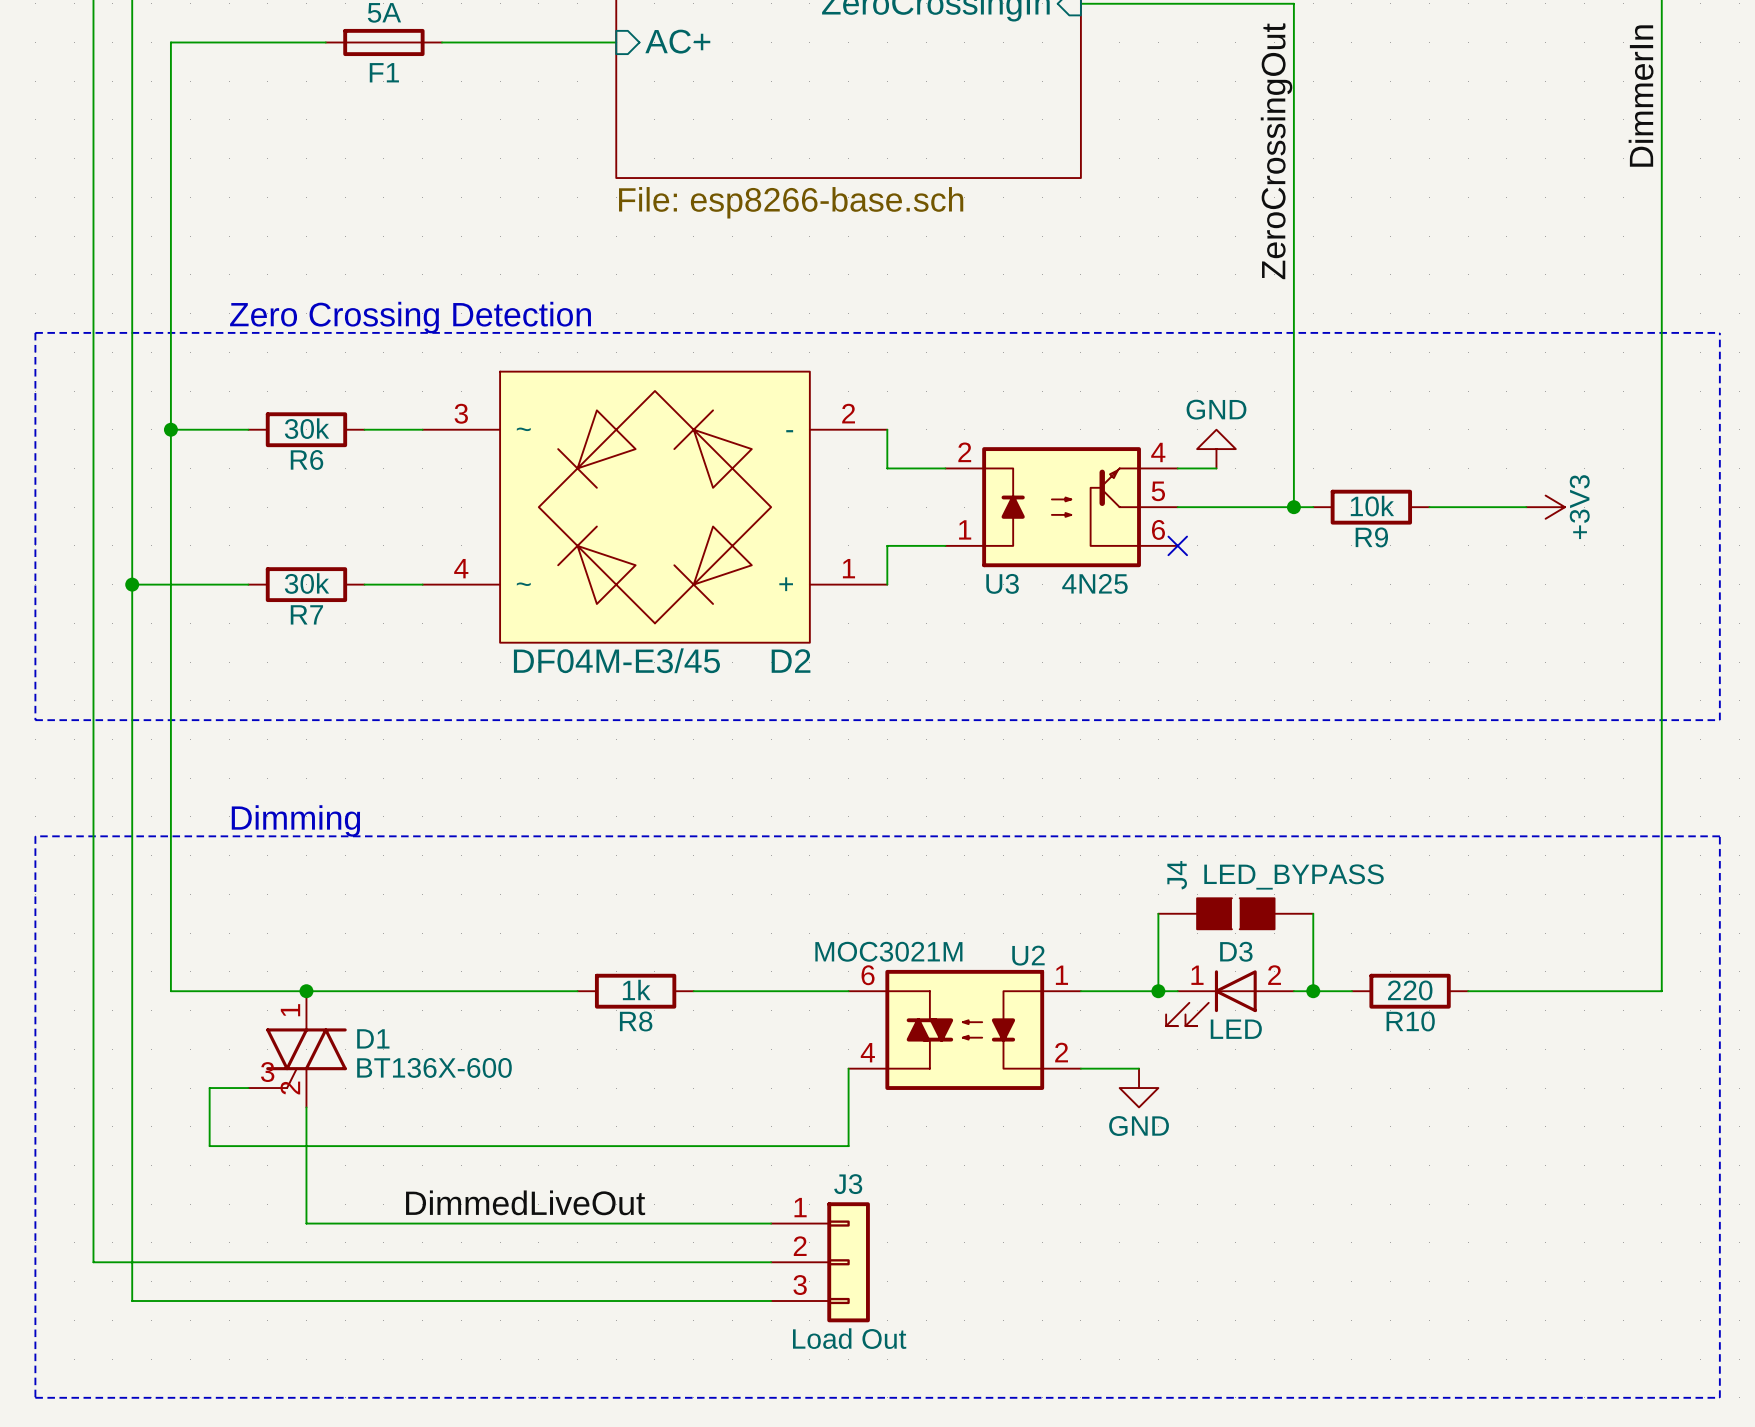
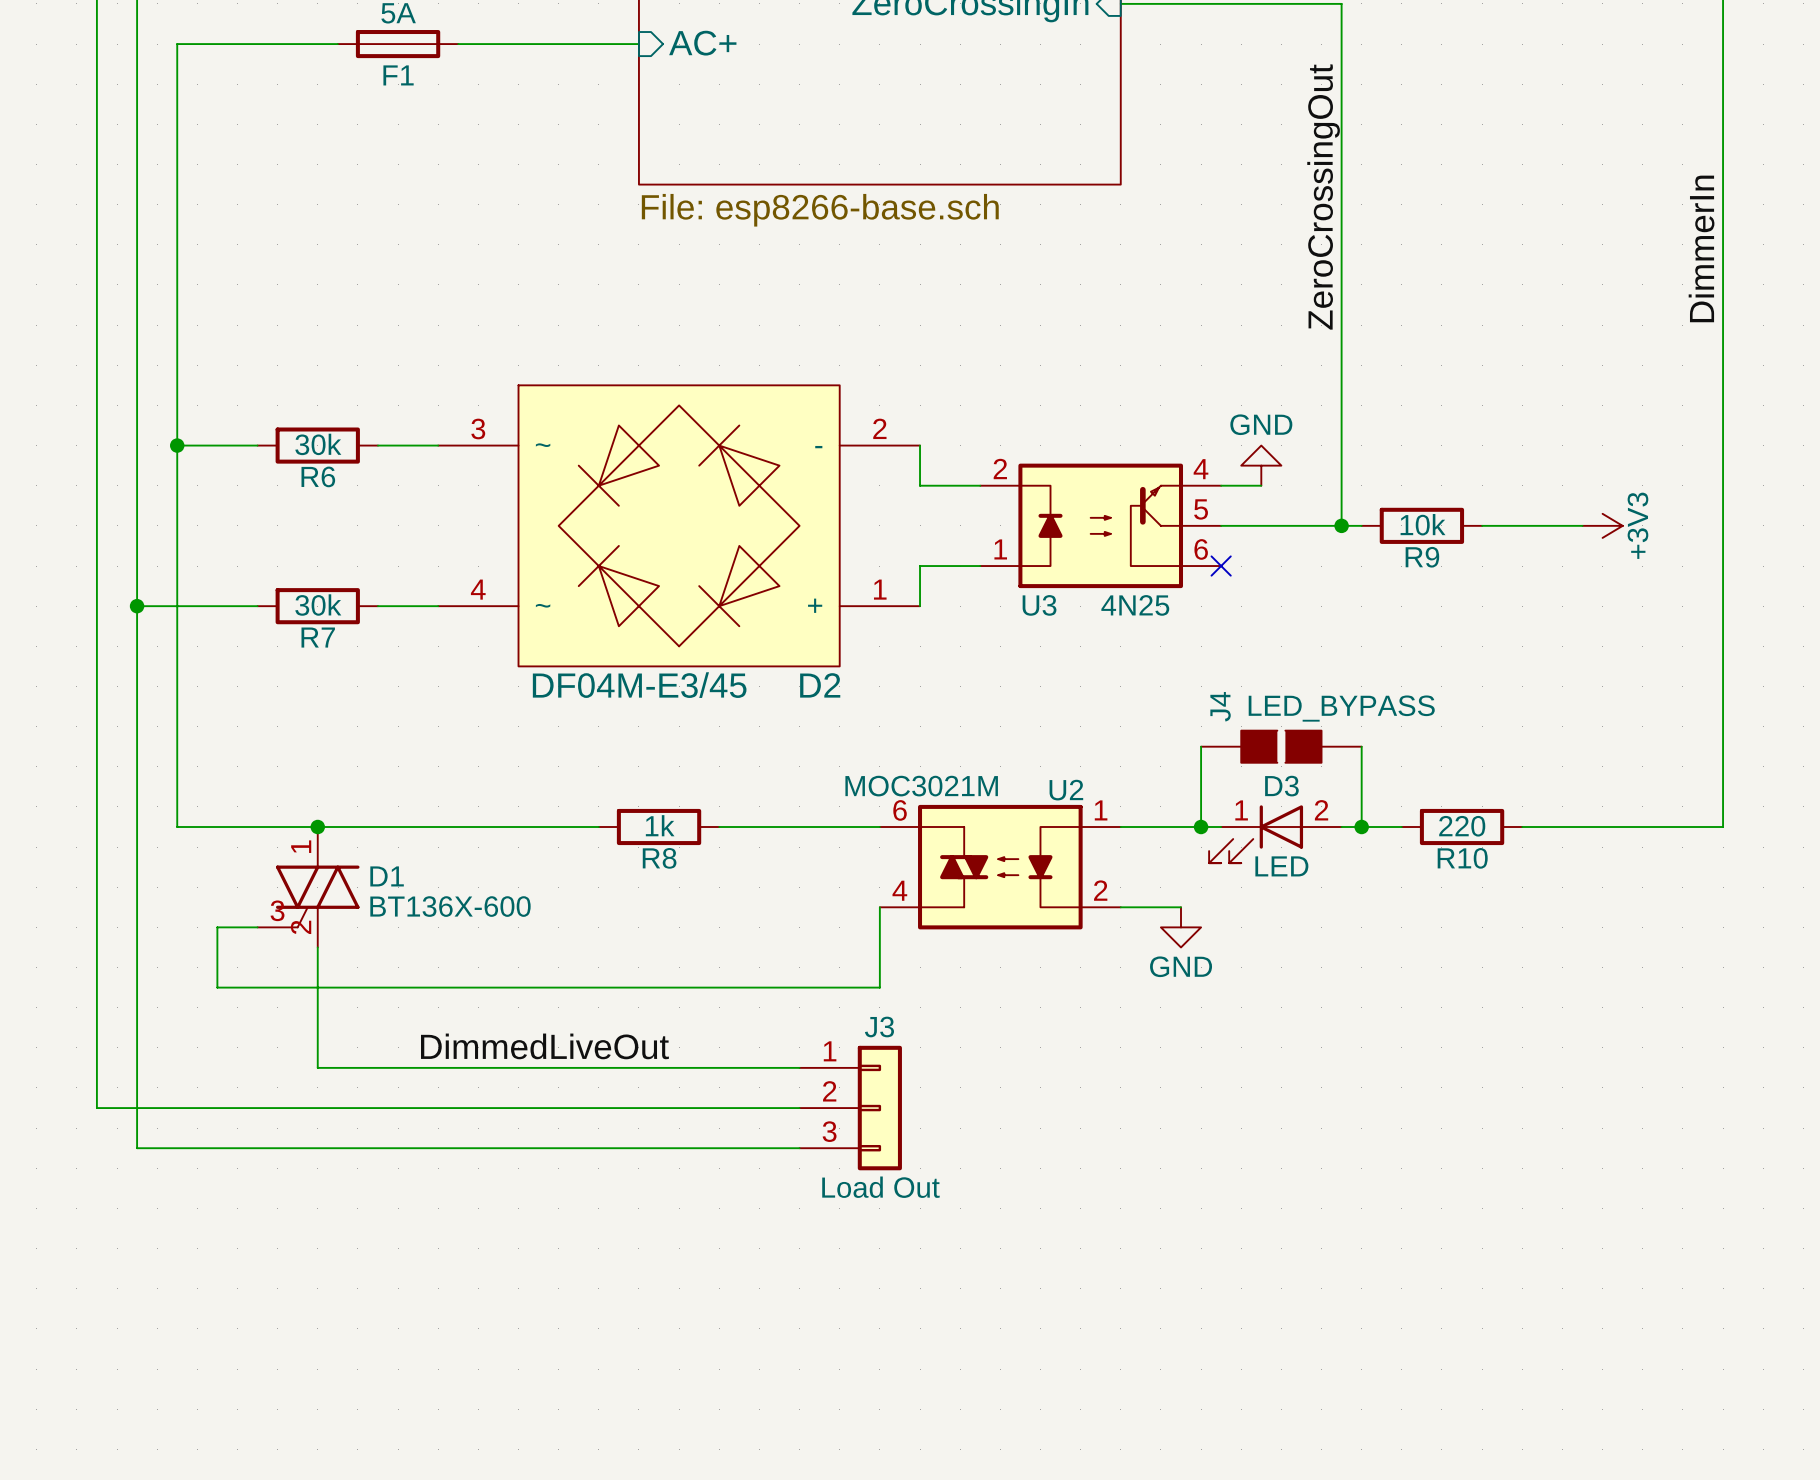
label position: DimmerIn (1641, 96) -> DimmerIn (1701, 248)
label position: ZeroCrossingOut (1276, 151) -> ZeroCrossingOut (1323, 197)
text: Zero Crossing Detection (410, 317) -> none
line: (35, 332) (1719, 332) (1719, 720) (35, 720) (35, 332) -> none
wire: (170, 797) (170, 991) (577, 991) -> (177, 827) (598, 827)
junction: none -> (317, 827)
junction: none -> (1201, 827)
junction: none -> (1361, 827)
wire: (1661, 797) (1661, 991) (1468, 991) -> (1723, 827) (1522, 827)
text: Dimming (295, 820) -> none
line: (35, 836) (35, 1397) (1719, 1397) (1719, 836) (35, 836) -> none
wire: (1158, 913) (1158, 991) -> (1201, 746) (1201, 827)
J4 position: (1235, 913) -> (1281, 746)
wire: (1313, 913) (1313, 991) -> (1361, 746) (1361, 827)
junction: (306, 991) -> none
R8 position: (635, 991) -> (659, 827)
wire: (693, 991) (848, 991) -> (719, 827) (879, 827)
wire: (1080, 991) (1177, 991) -> (1120, 827) (1221, 827)
junction: (1158, 991) -> none
wire: (1293, 991) (1351, 991) -> (1341, 827) (1401, 827)
junction: (1313, 991) -> none
R10 position: (1410, 991) -> (1462, 827)
D3 position: (1230, 998) -> (1275, 834)
U2 position: (964, 1029) -> (1000, 867)
D1 position: (297, 1049) -> (308, 887)
wire: (93, 1068) (93, 1262) (771, 1262) -> (96, 1108) (799, 1108)
wire: (848, 1068) (848, 1146) (209, 1146) (209, 1088) (248, 1088) -> (879, 907) (879, 987) (217, 987) (217, 927) (257, 927)
wire: (1080, 1068) (1139, 1068) -> (1120, 907) (1181, 907)
power symbol position: GND (1139, 1088) -> GND (1181, 927)
wire: (132, 1107) (132, 1301) (771, 1301) -> (137, 1148) (799, 1148)
wire: (306, 1107) (306, 1223) (771, 1223) -> (317, 947) (317, 1067) (799, 1067)
label position: DimmedLiveOut (525, 1202) -> DimmedLiveOut (544, 1046)
J3 position: (820, 1262) -> (850, 1108)

